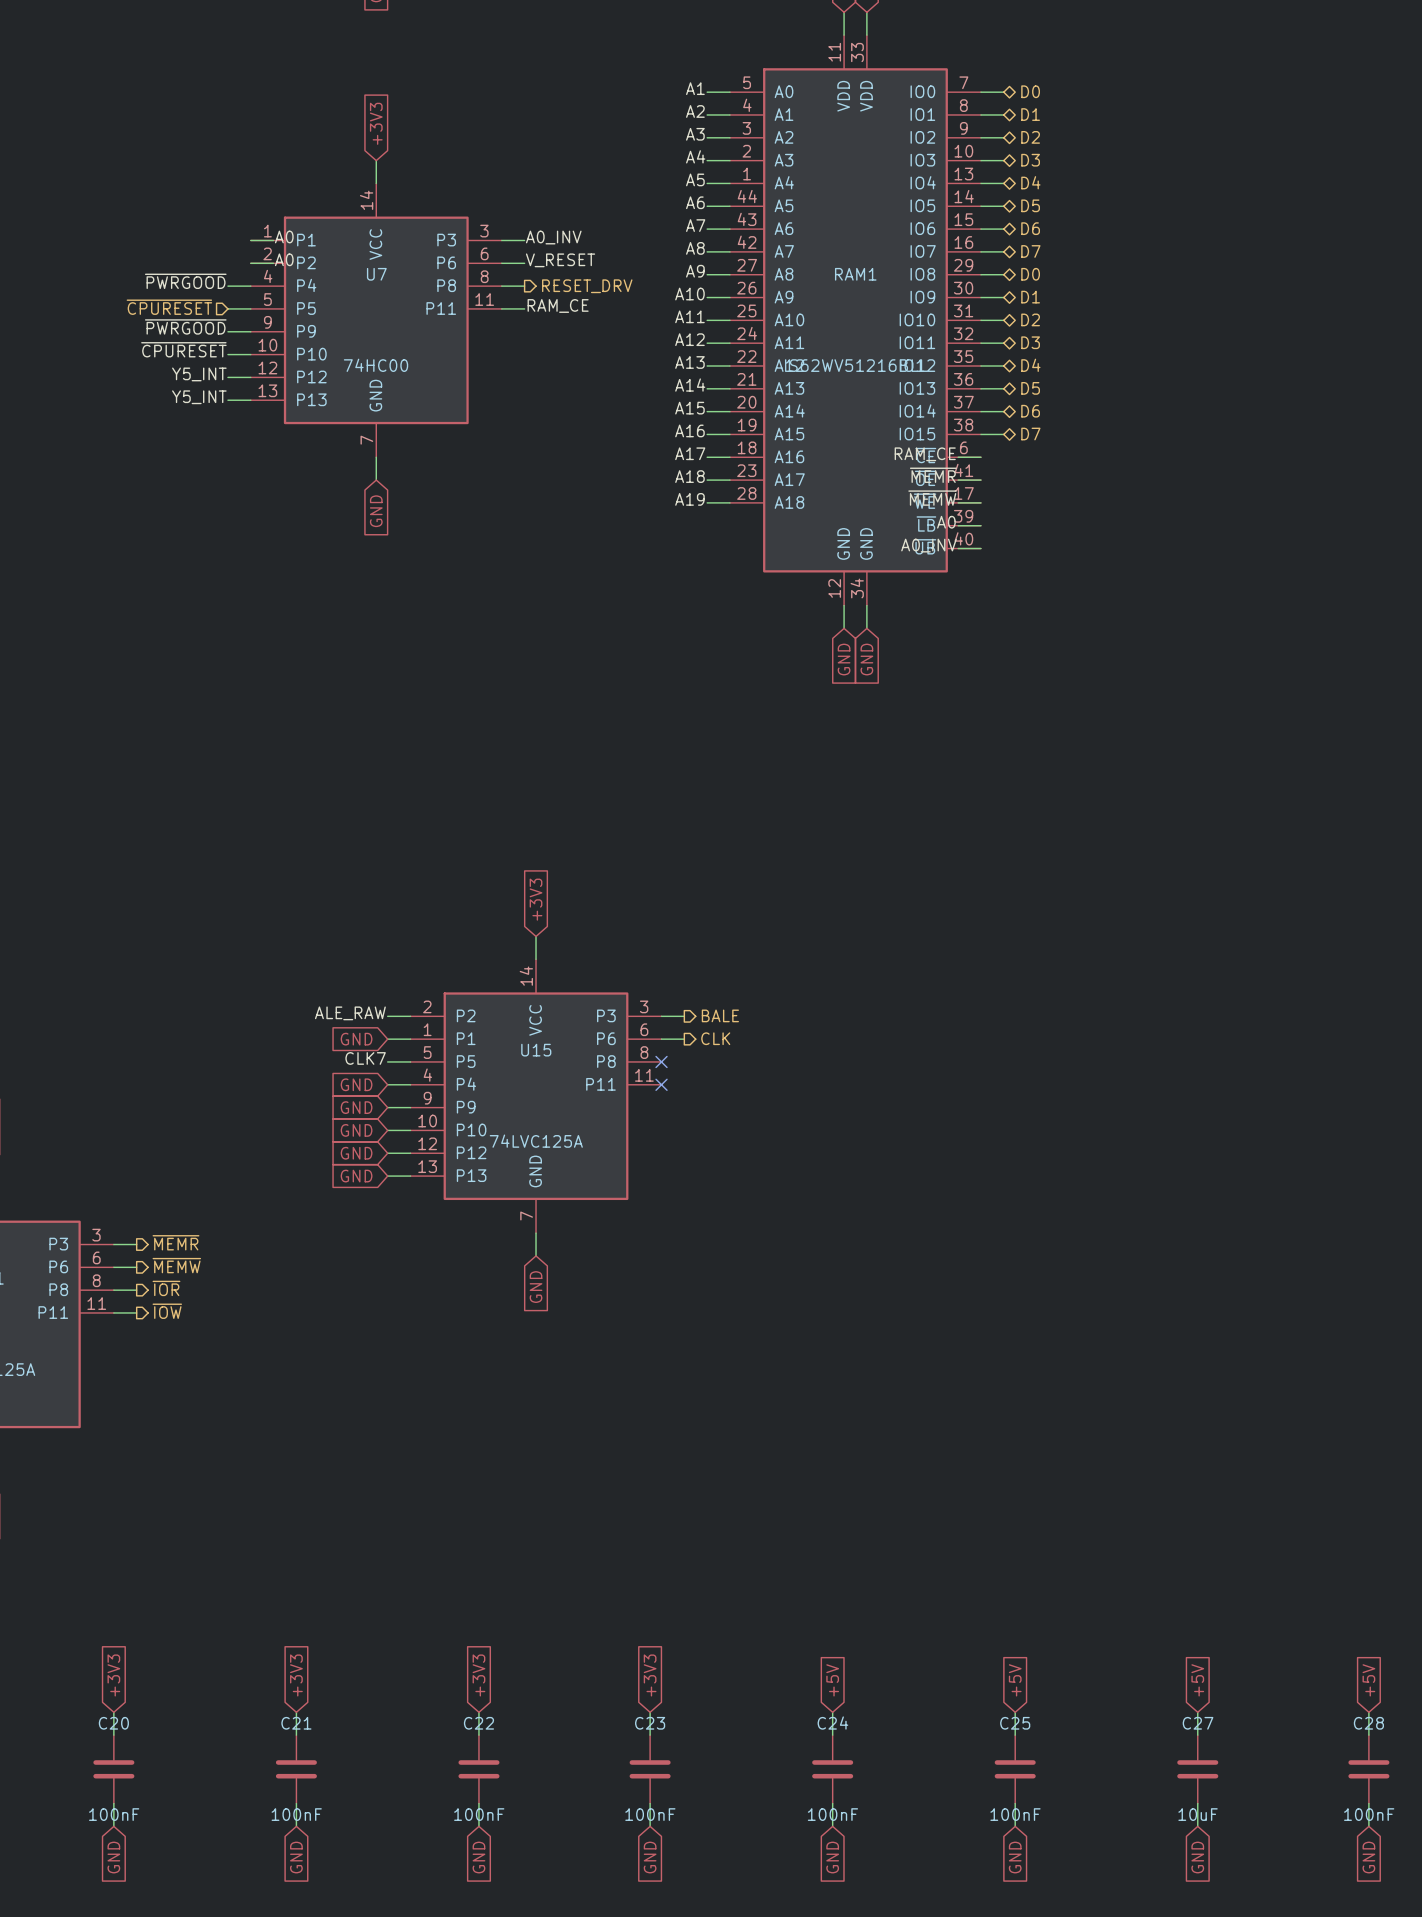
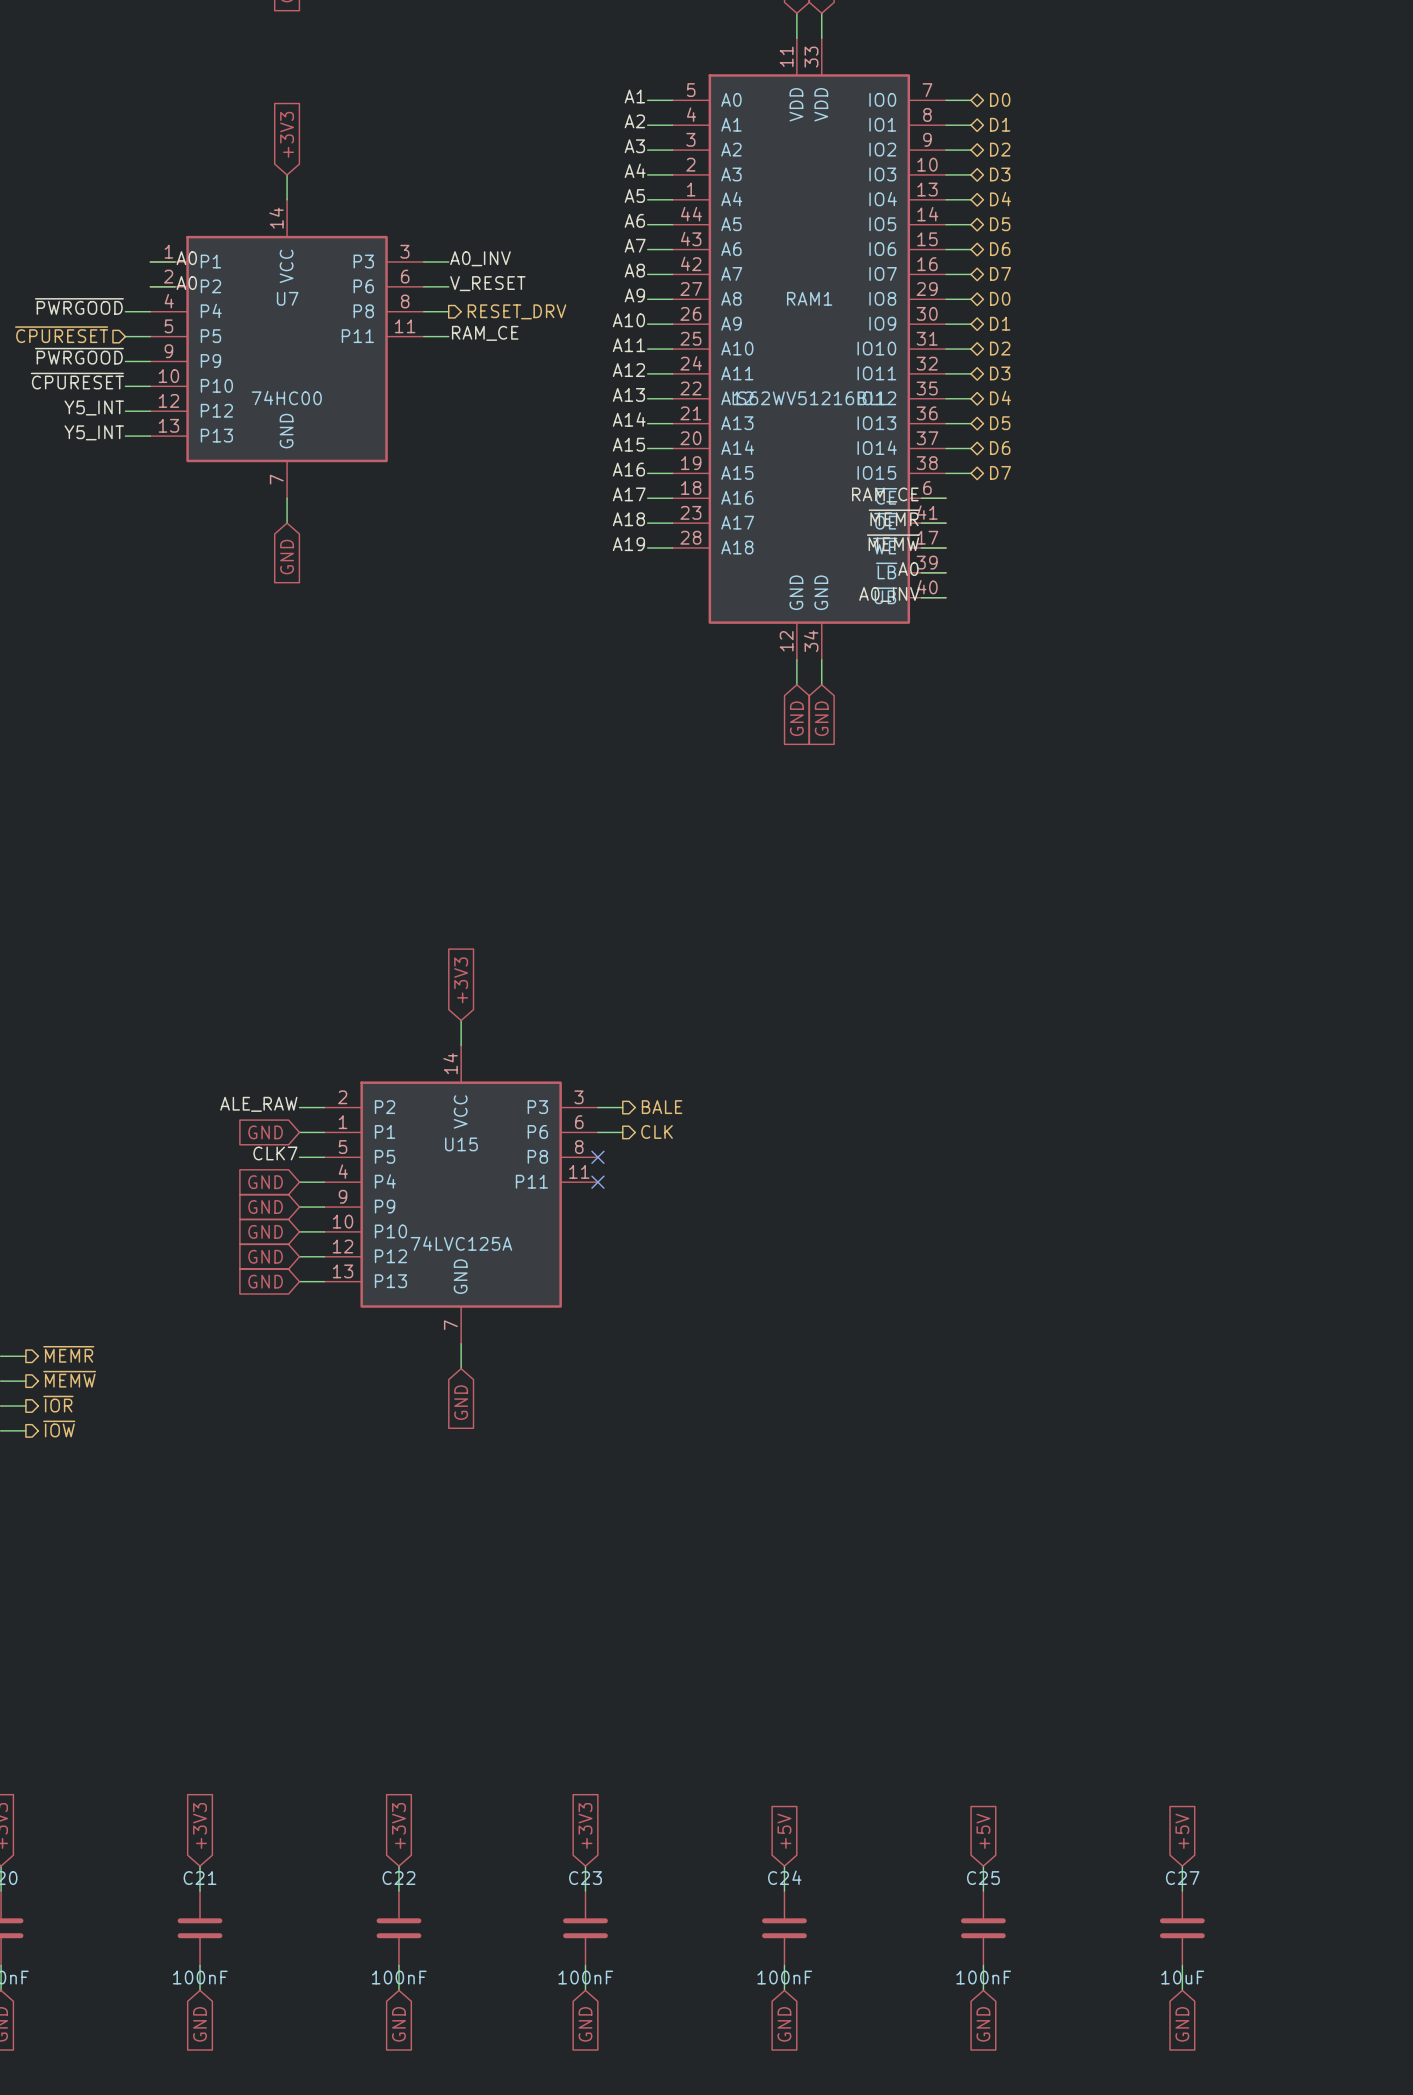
global label: +5V (1368, 1680) -> none
wire: (1368, 1712) (1368, 1735) -> none
C28: 100nF (1368, 1769) -> none
wire: (1368, 1803) (1368, 1826) -> none
global label: GND (1368, 1857) -> none

